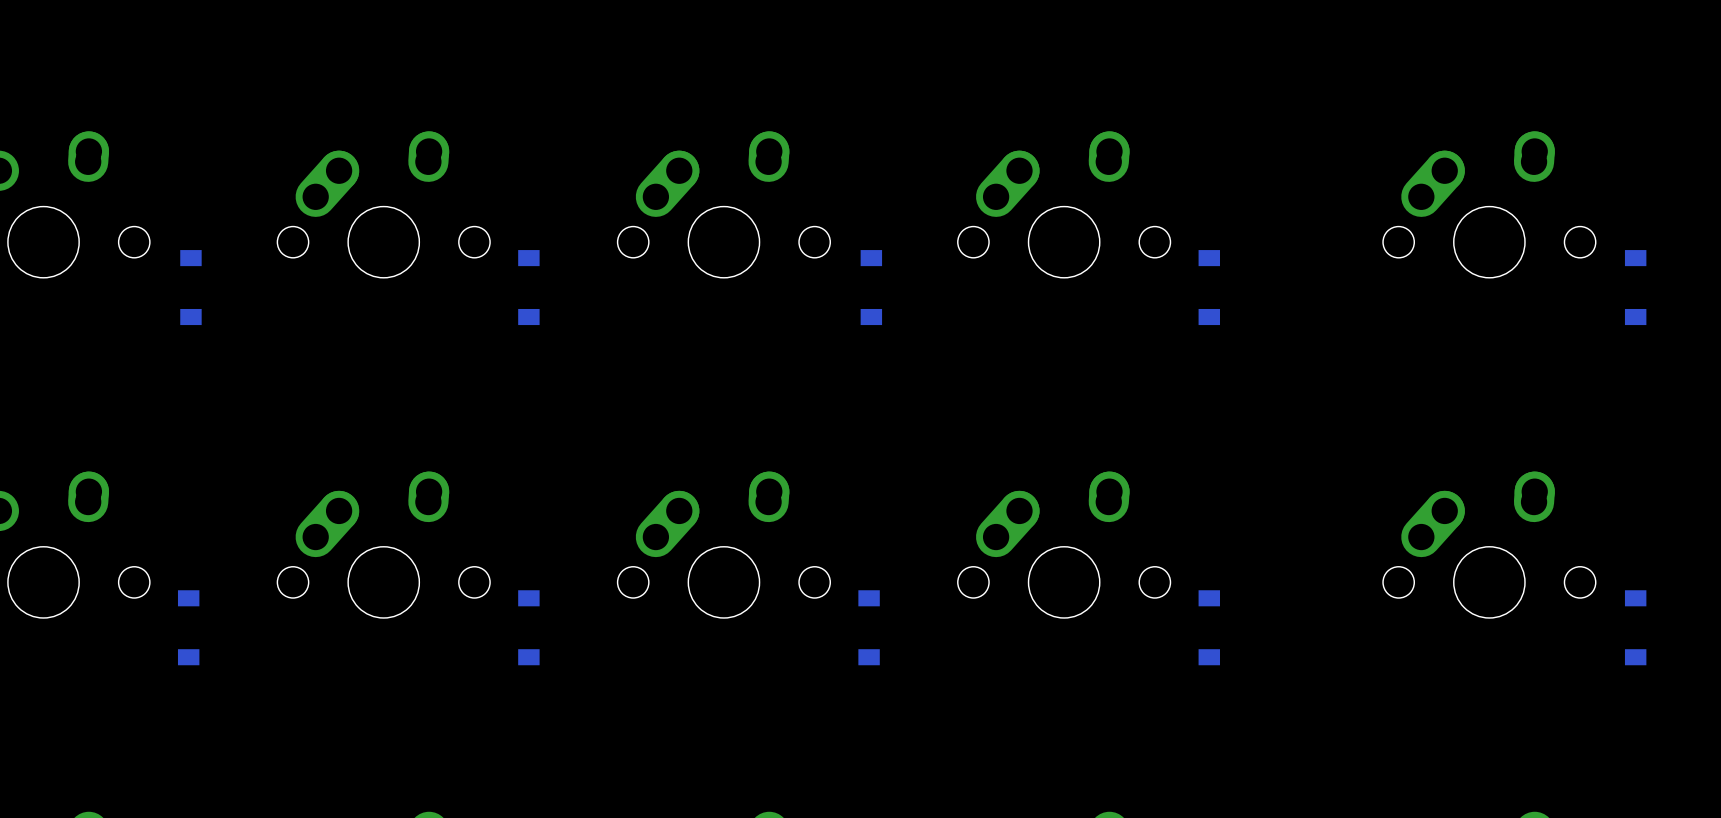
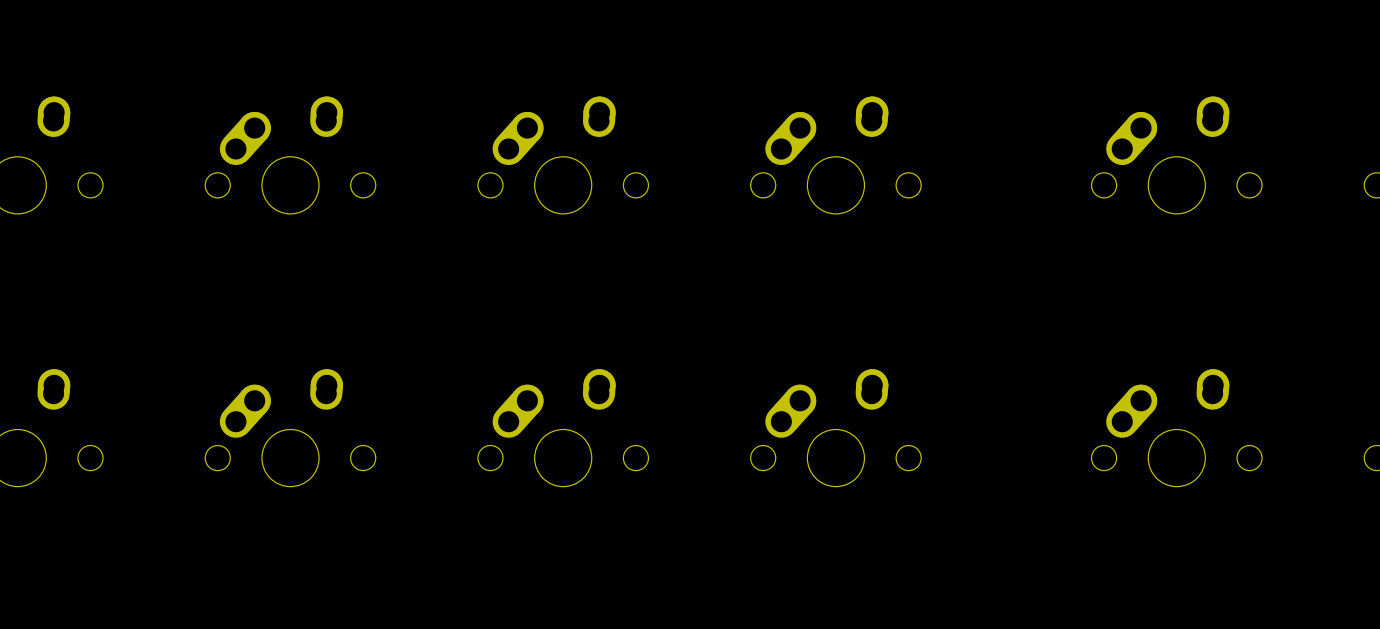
part: (190, 287) -> none
part: (528, 287) -> none
part: (871, 287) -> none
part: (1209, 287) -> none
part: (1635, 287) -> none
part: (188, 627) -> none
part: (528, 627) -> none
part: (869, 627) -> none
part: (1209, 627) -> none
part: (1635, 627) -> none

